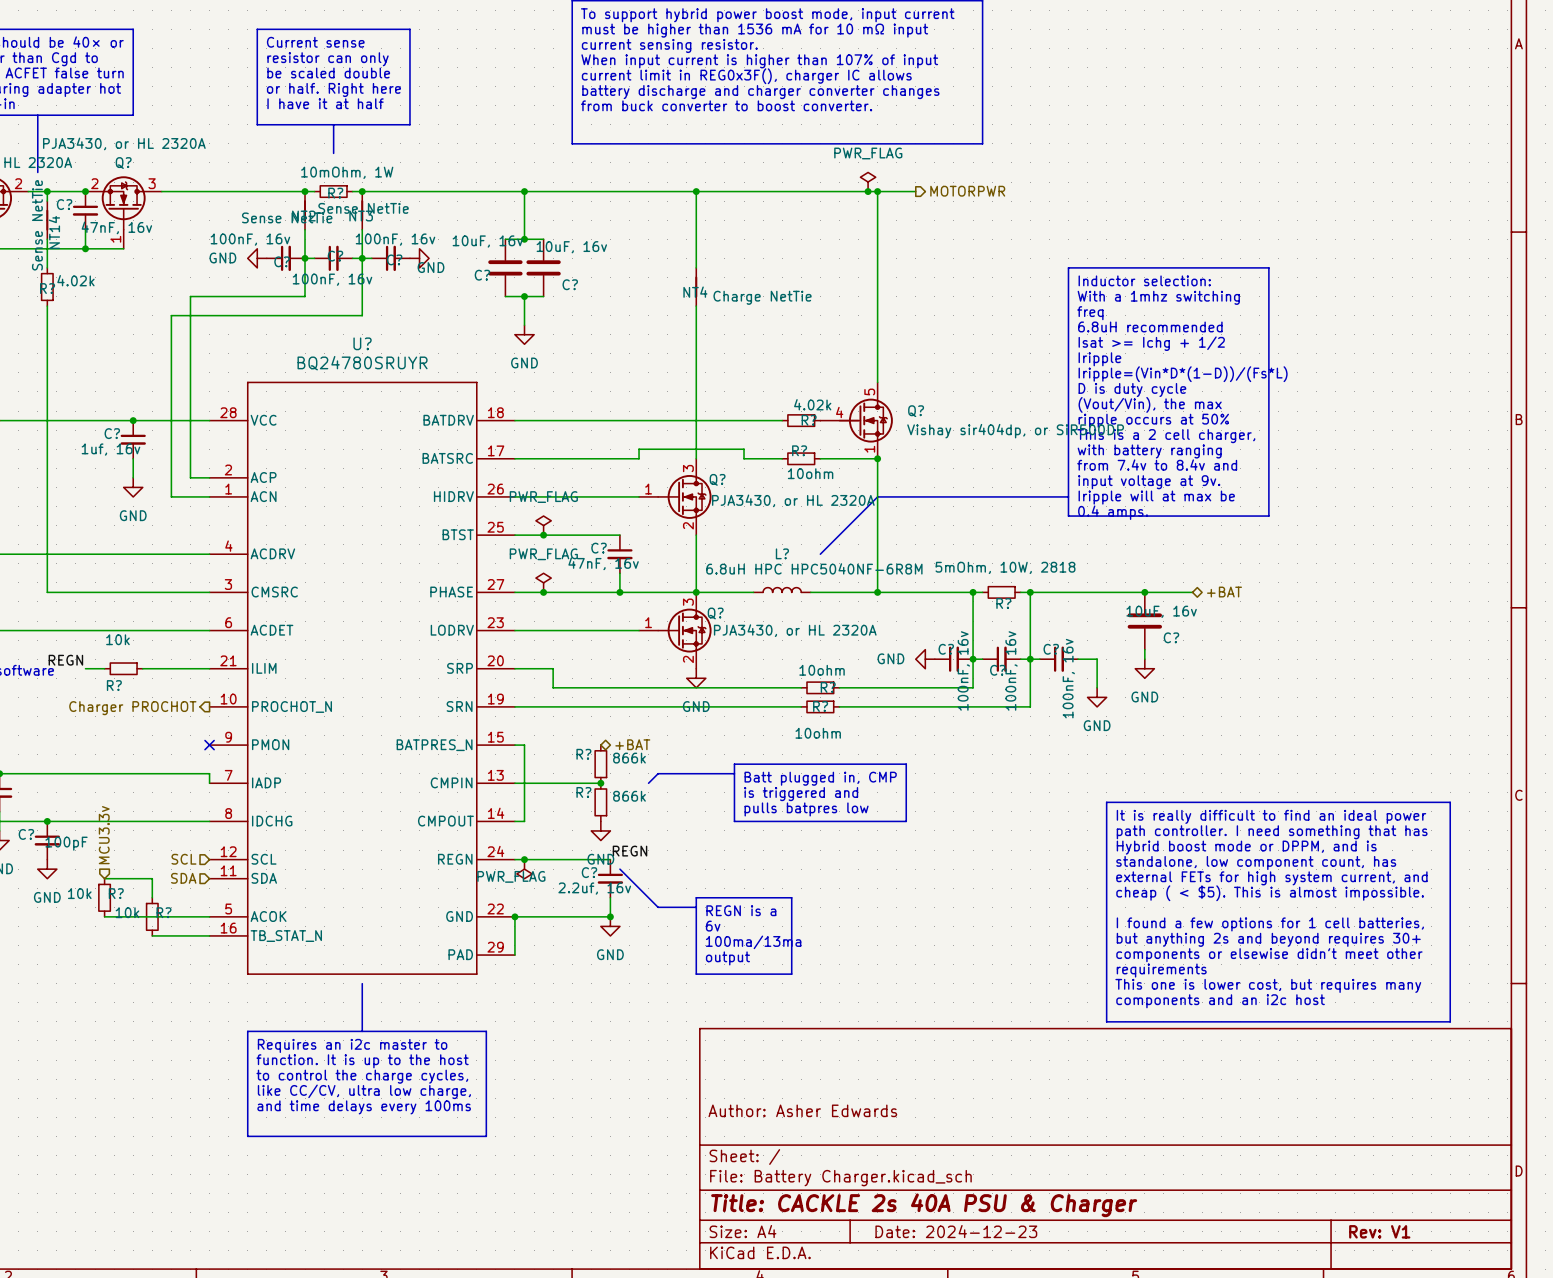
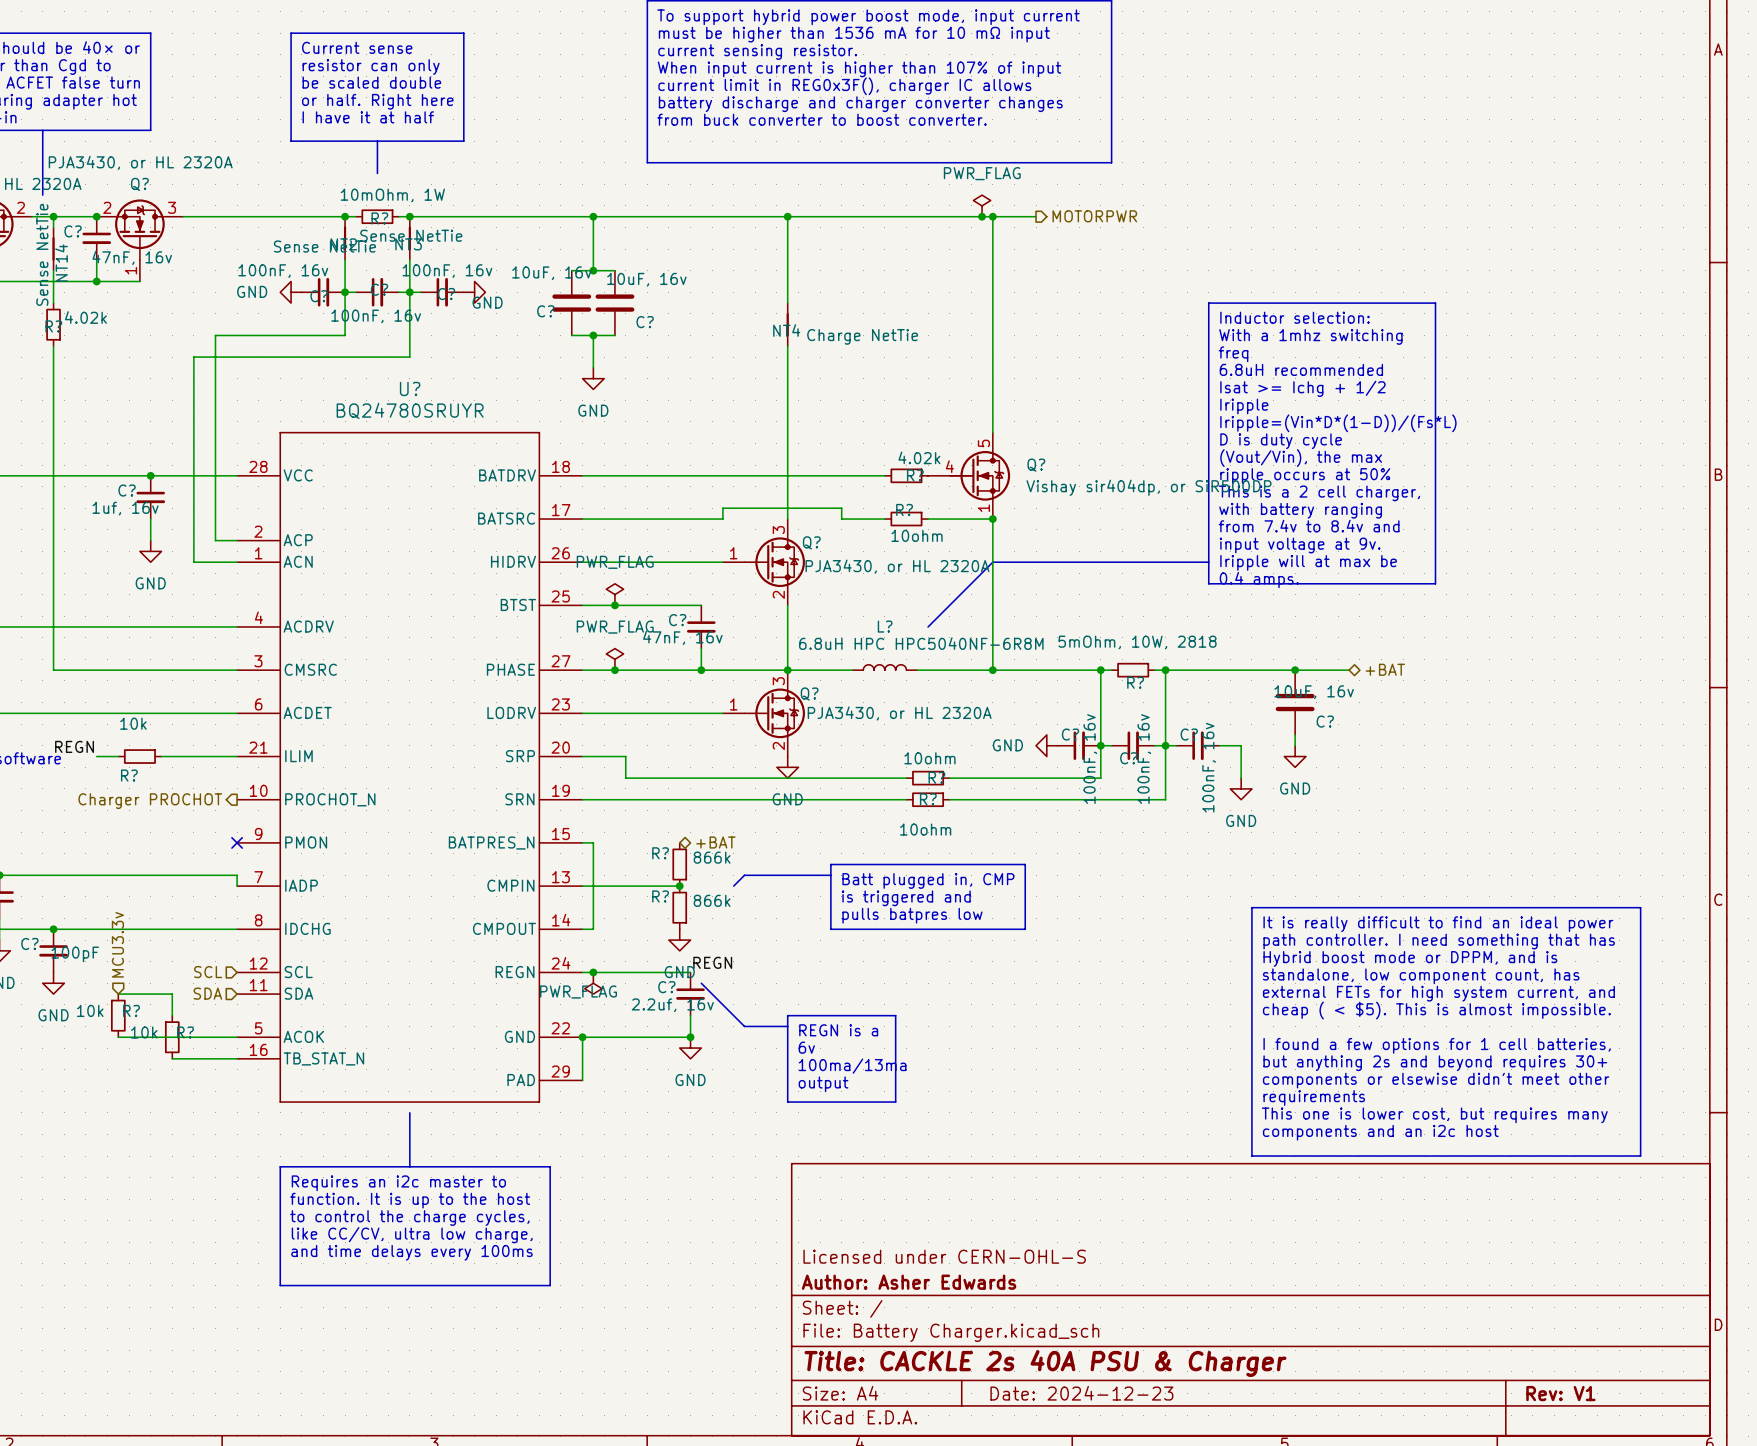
title block: Author: Asher Edwards (802, 1110) -> Licensed under CERN-OHL-S (944, 1256)
title block: none -> Author: Asher Edwards (909, 1282)

